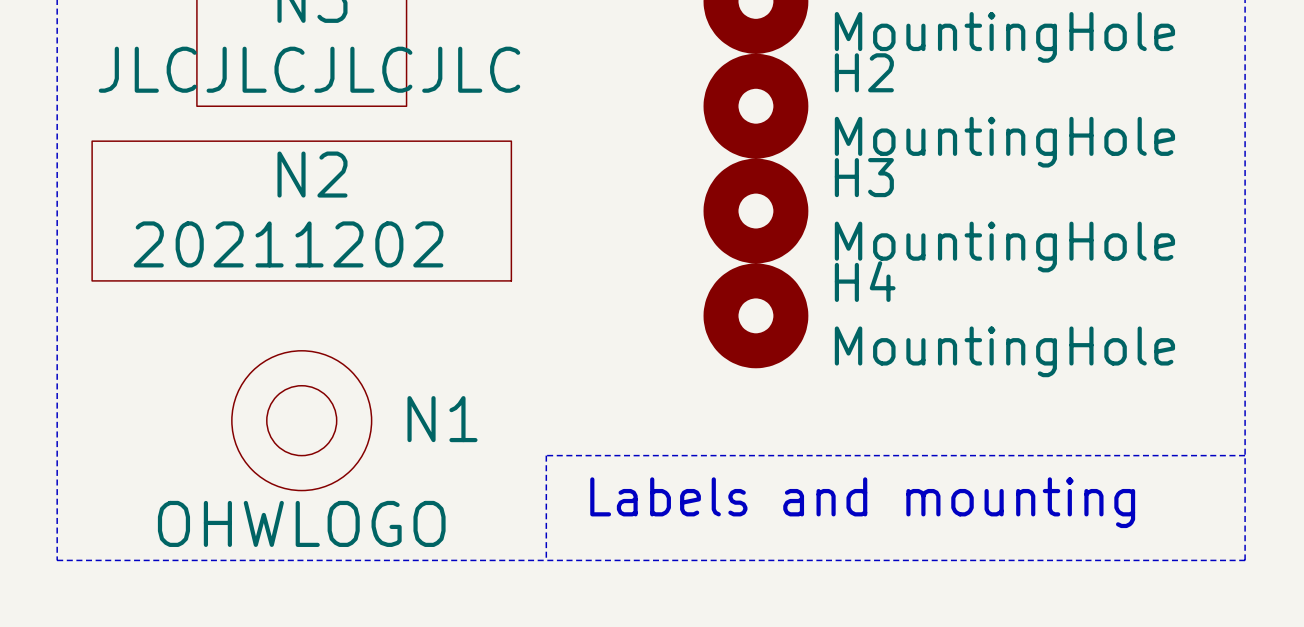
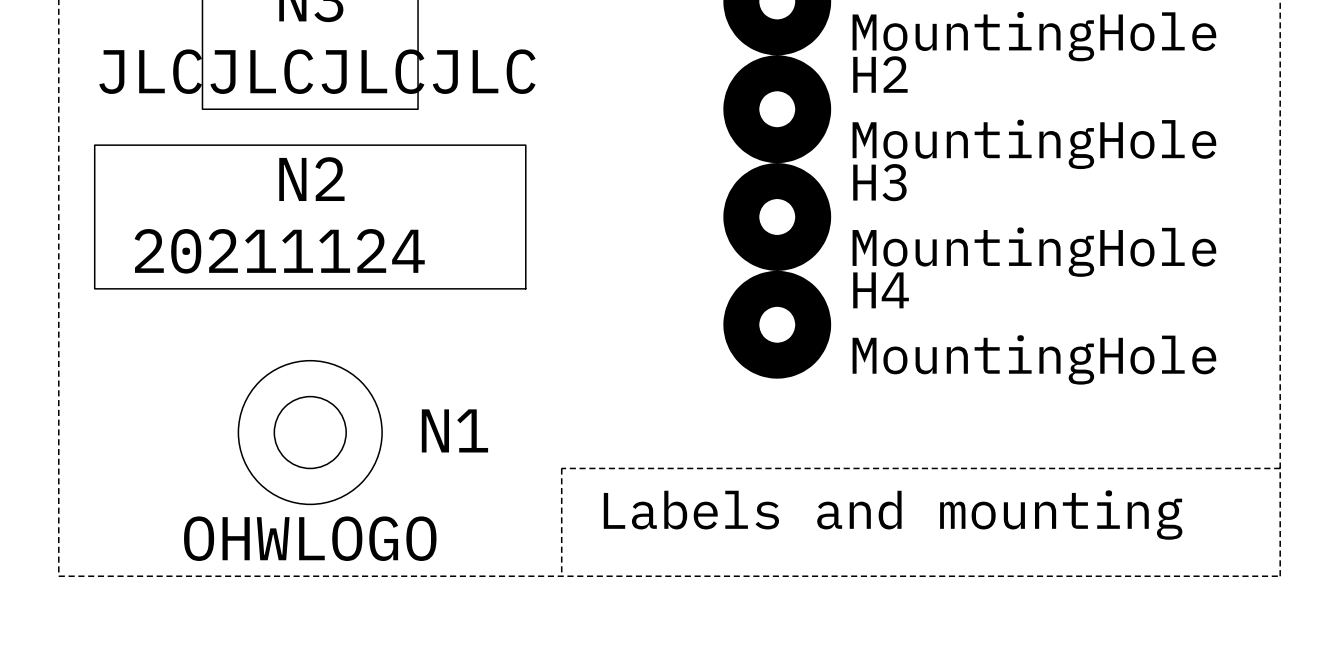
N2 value: 20211202 (288, 244) -> 20211124 (279, 251)

